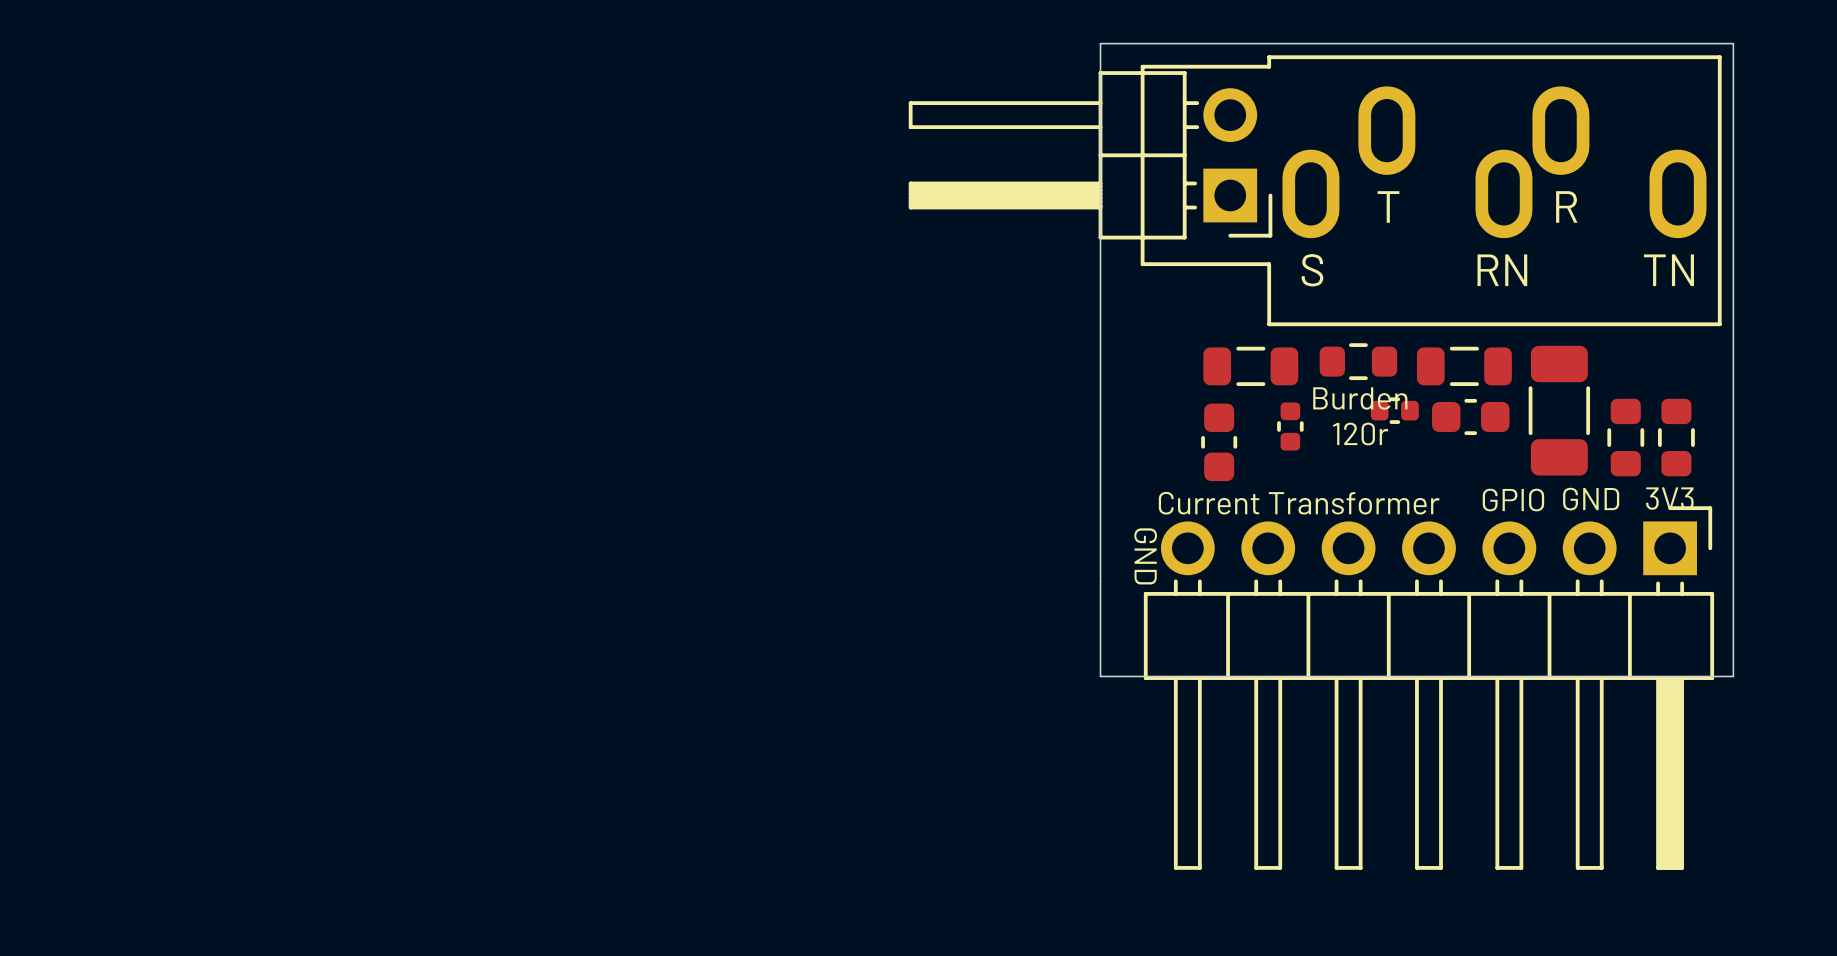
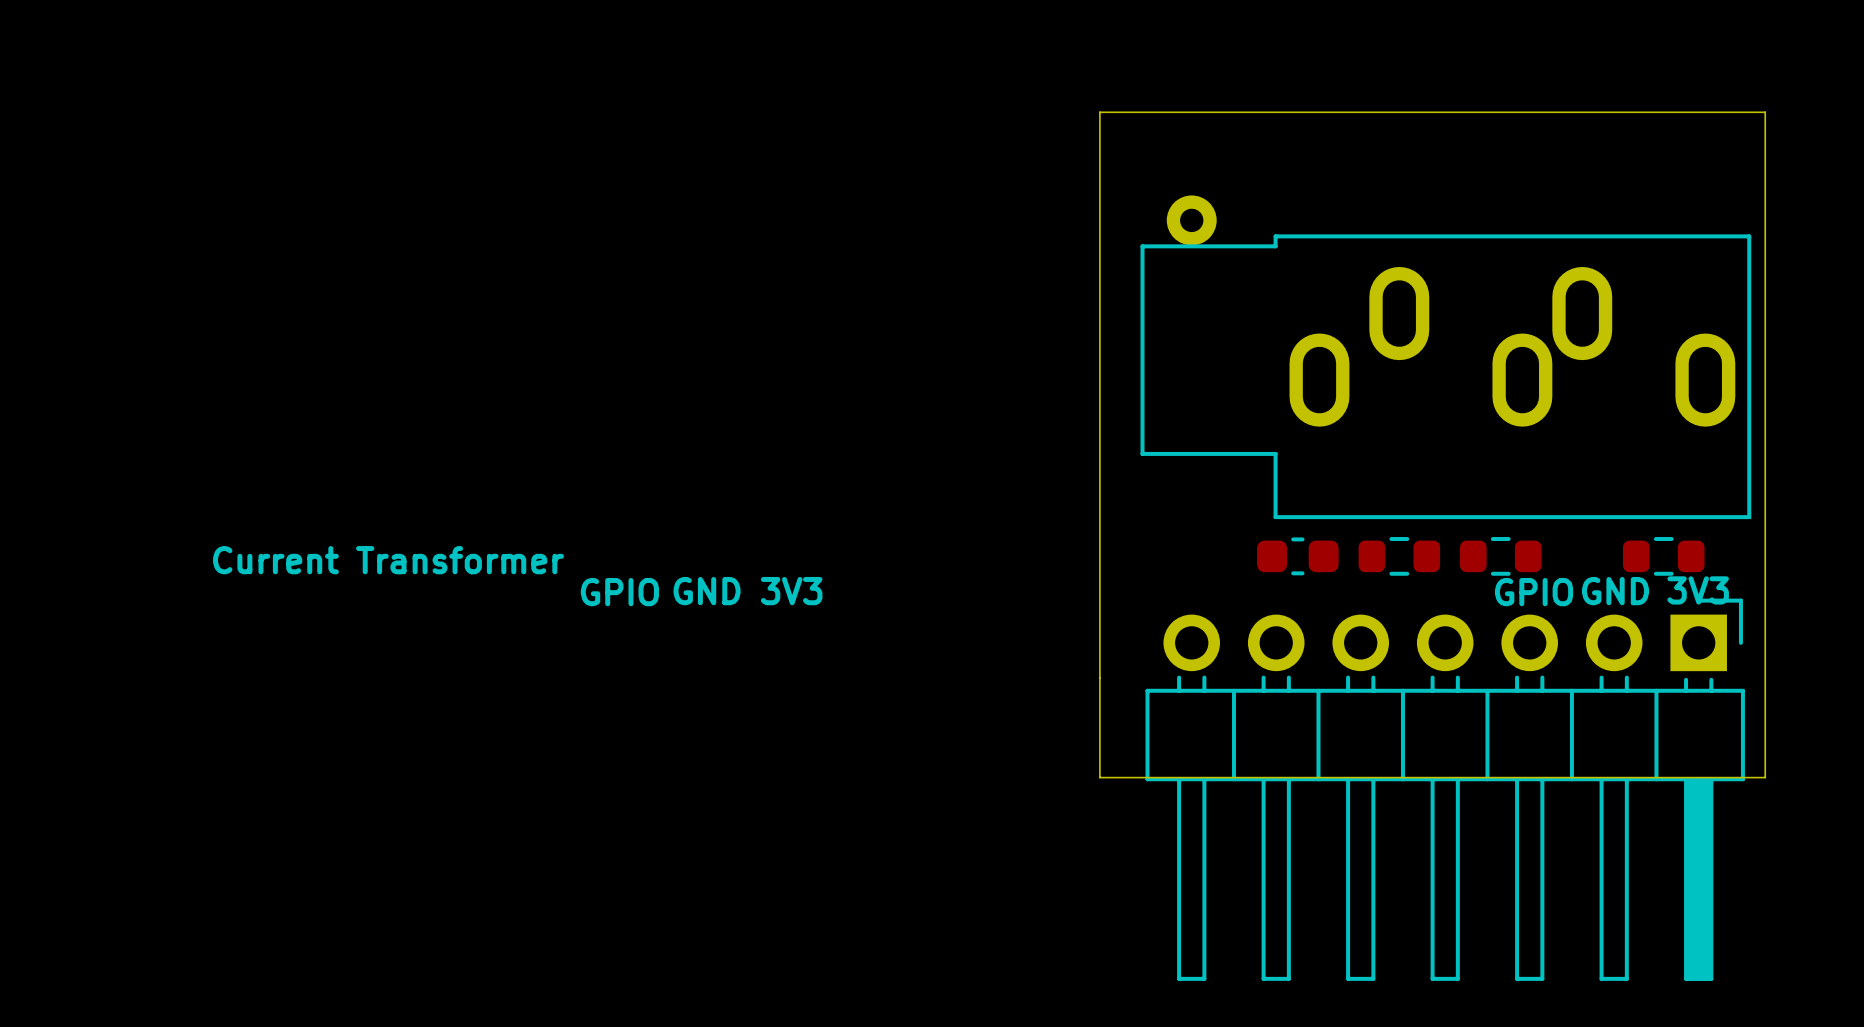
part: none -> (1191, 220)
part: (1090, 155) -> none
part position: (1431, 190) -> (1445, 376)
text: T (1388, 206) -> none
text: R (1566, 206) -> none
text: S (1312, 270) -> none
text: RN (1502, 270) -> none
text: TN (1668, 270) -> none
part: (1358, 361) -> none
part: (1250, 366) -> none
part: (1464, 366) -> none
text: Burden (1360, 398) -> none
part: (1394, 410) -> none
part: (1559, 410) -> none
part: (1470, 417) -> none
part: (1290, 426) -> none
text: 120r (1360, 434) -> none
part: (1625, 437) -> none
part: (1676, 437) -> none
part rotation: 0° (1219, 442) -> 90° clockwise (1297, 556)
part position: (1219, 442) -> (1297, 556)
part: none -> (1399, 556)
part: none -> (1500, 556)
part: none -> (1663, 556)
text: none -> Current Transformer (388, 560)
text: none -> 3V3 (791, 591)
text: none -> GPIO (619, 592)
text: Current Transformer (1299, 503) -> none
text rotation: 0° (1145, 556) -> 90° counterclockwise (707, 591)
text position: GND (1145, 556) -> GND (707, 591)

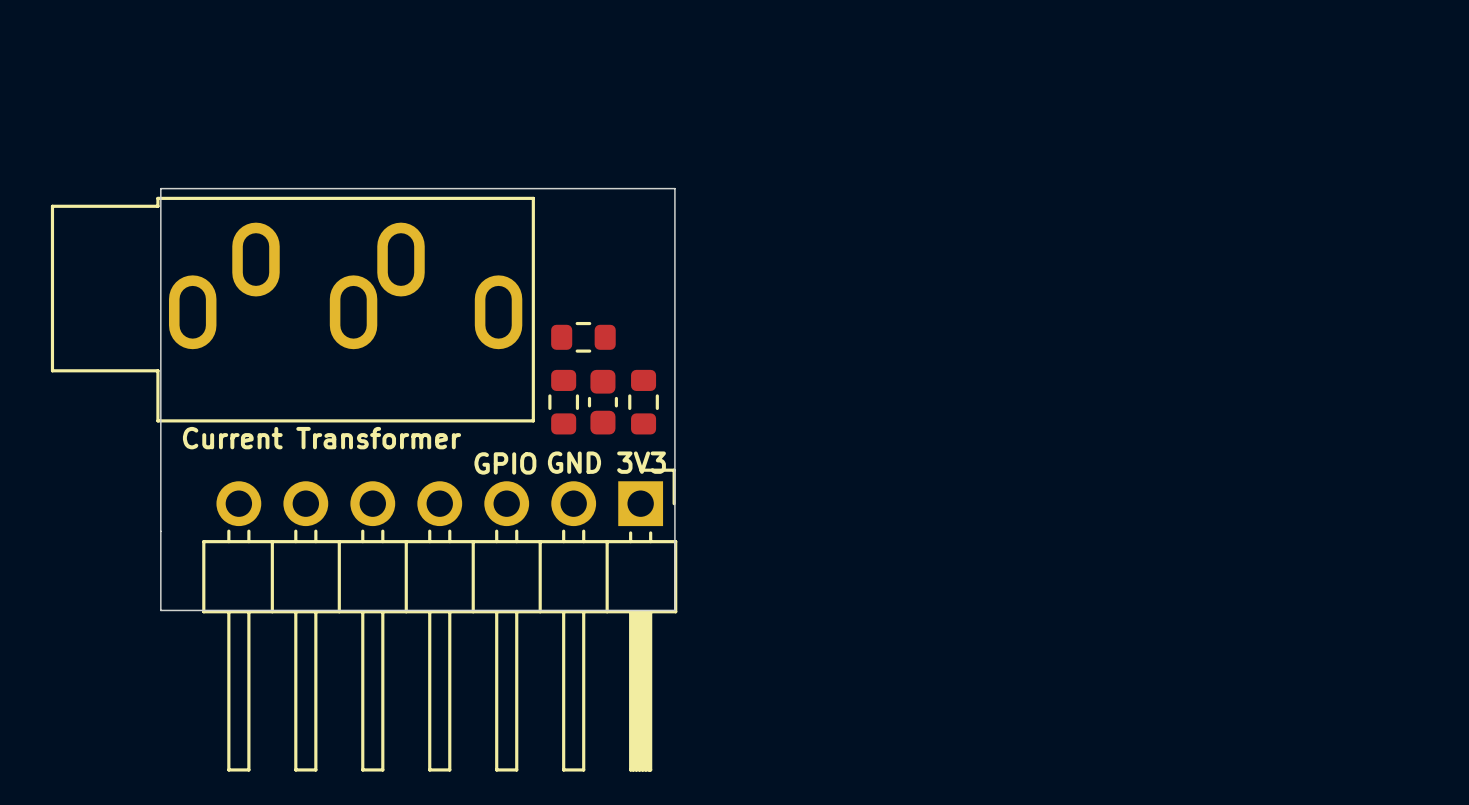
board edge: (1099, 112) (1765, 112) (1765, 777) (1099, 777) (1099, 112) -> none
part: (1191, 220) -> none
board edge: none -> (160, 188) (160, 610) (674, 610) (674, 188) (160, 188)
part: (1445, 376) -> none
part: none -> (292, 309)
part: none -> (583, 337)
part: none -> (563, 402)
part: none -> (643, 402)
part rotation: 0° (1297, 556) -> 90° clockwise (602, 402)
part position: (1297, 556) -> (602, 402)
part: (1399, 556) -> none
part: (1500, 556) -> none
part: (1663, 556) -> none
text: 3V3 (1698, 590) -> none
text: GND (1615, 591) -> none
text: GPIO (1534, 592) -> none
part: none -> (439, 620)
part: (1445, 789) -> none

